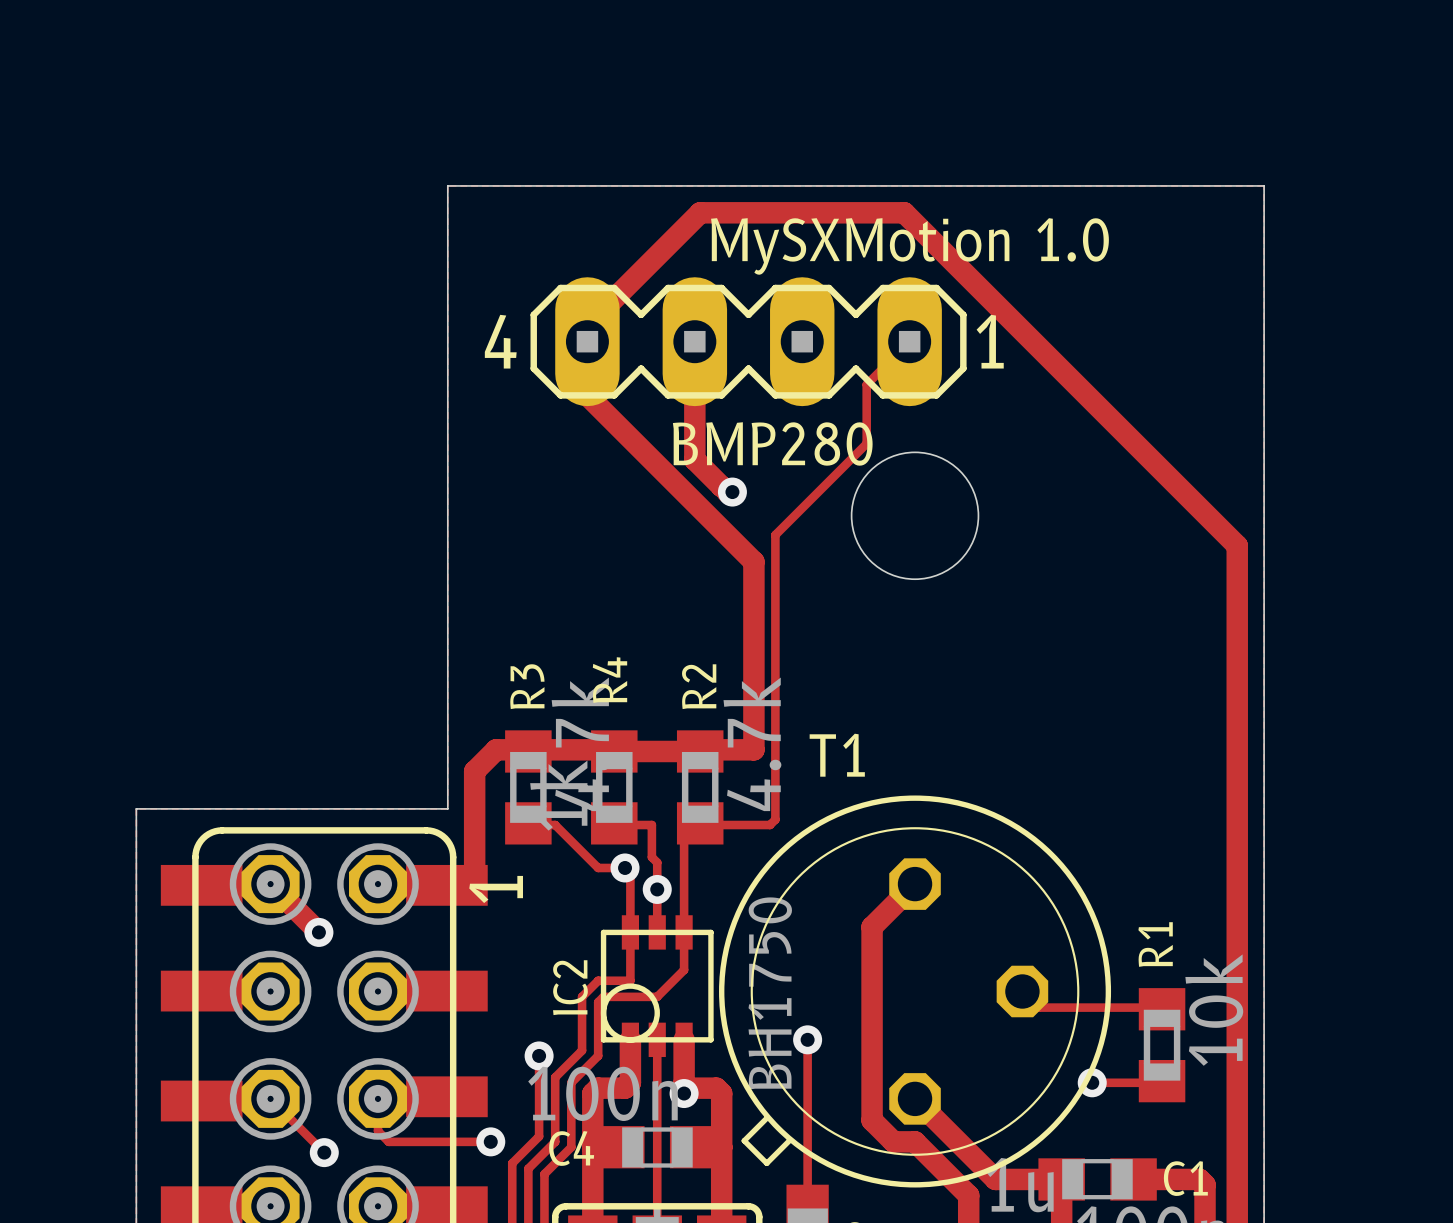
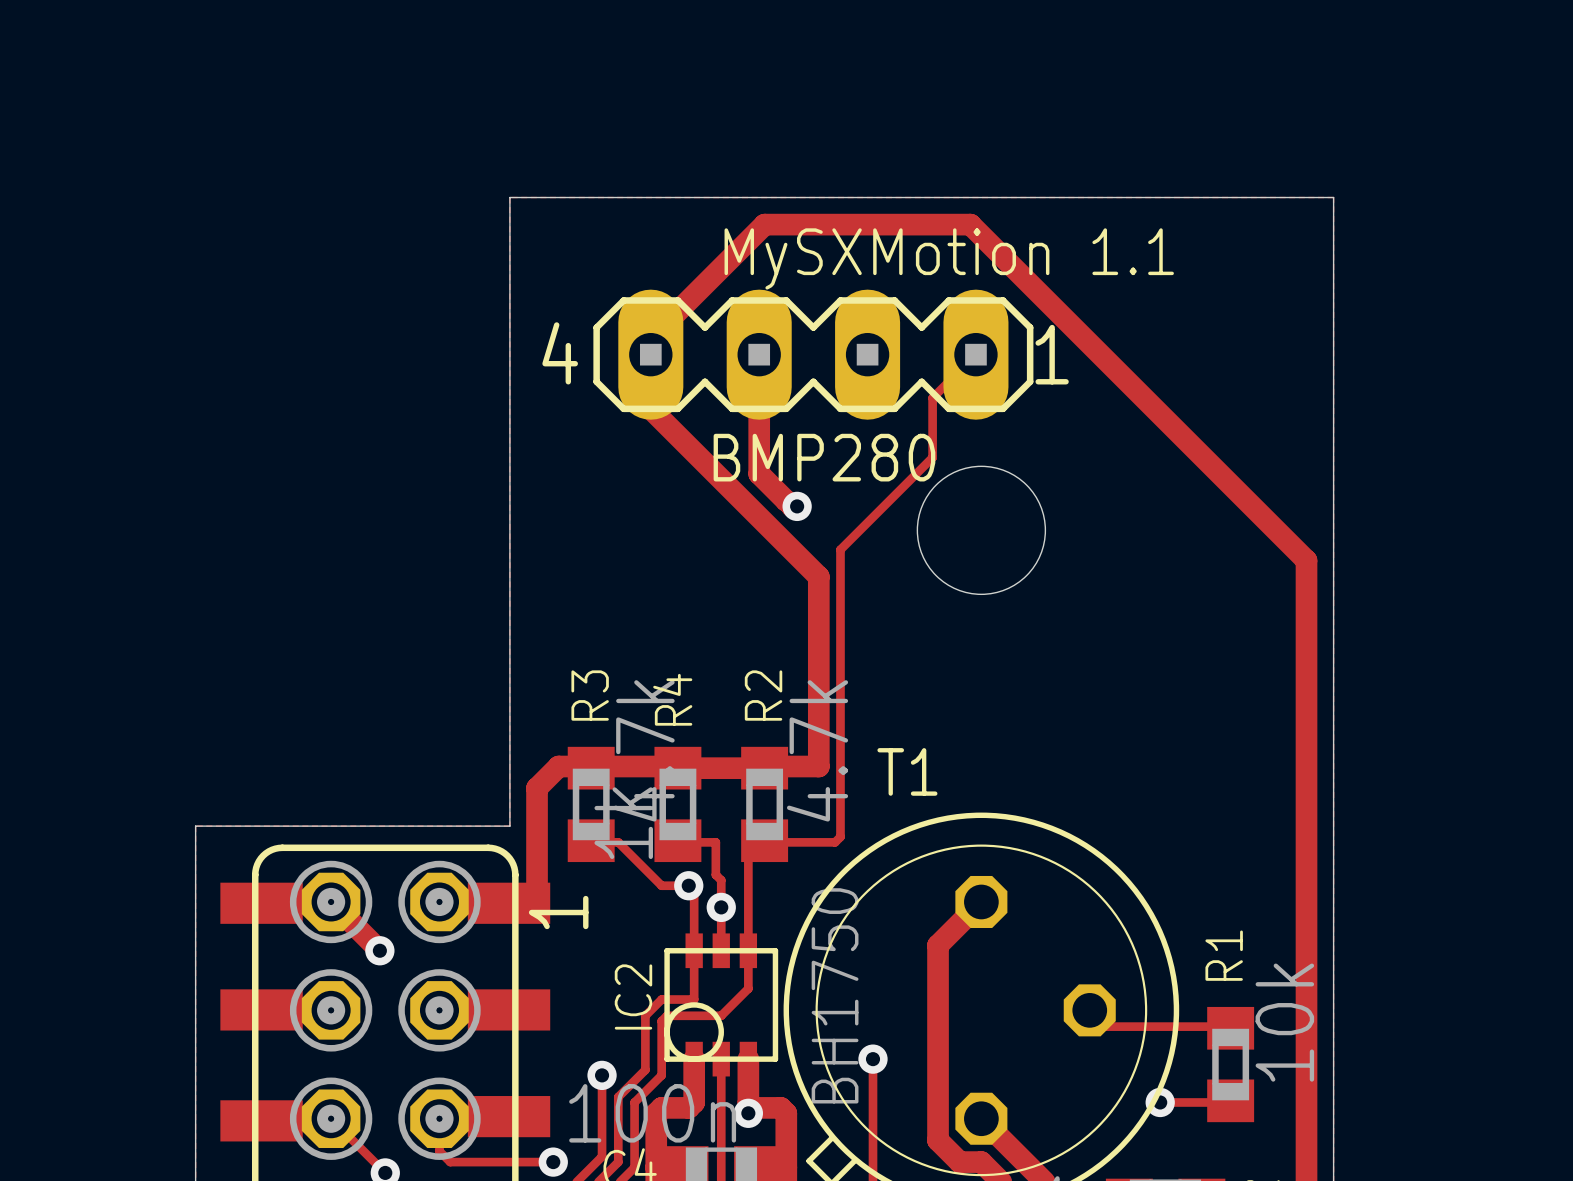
text: MySXMotion 1.0 (909, 246) -> MySXMotion 1.1 (949, 258)

